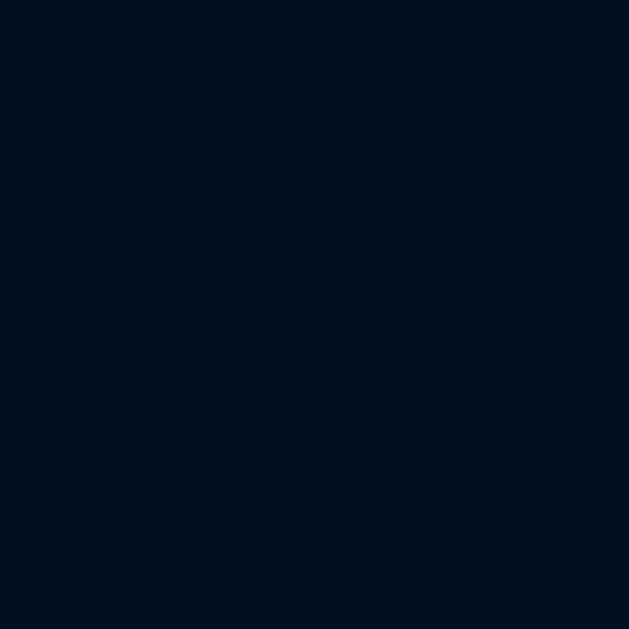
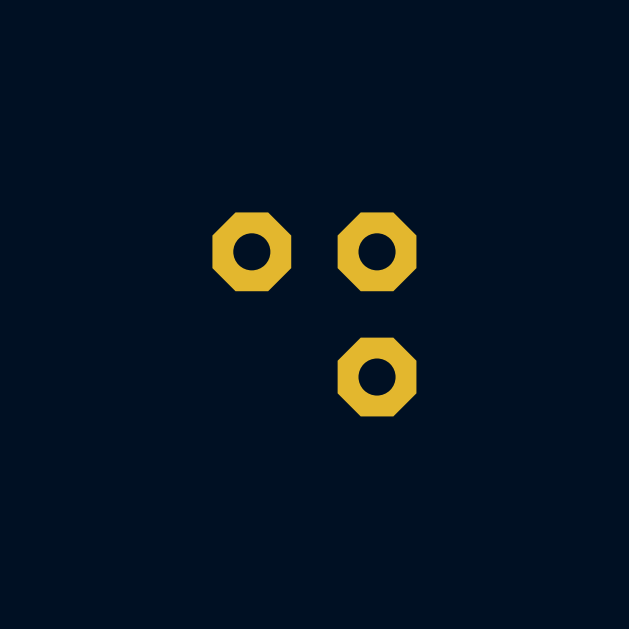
part: none -> (251, 251)
part: none -> (377, 251)
part: none -> (377, 377)

